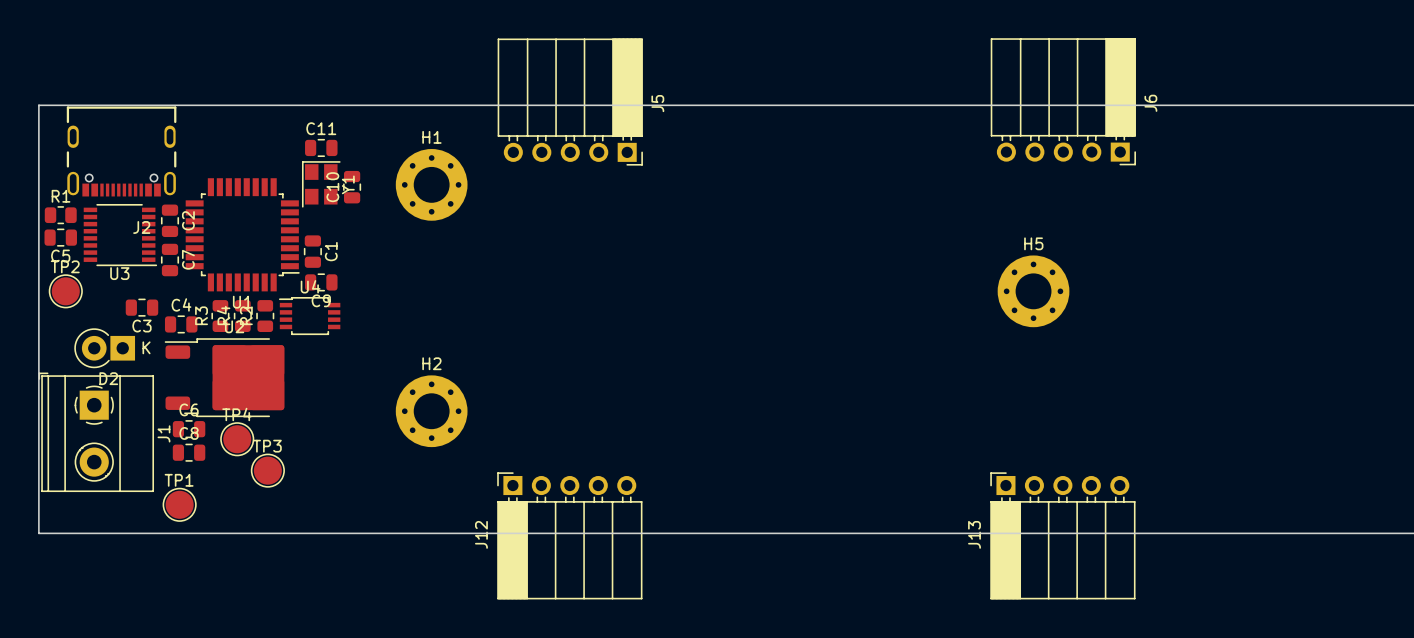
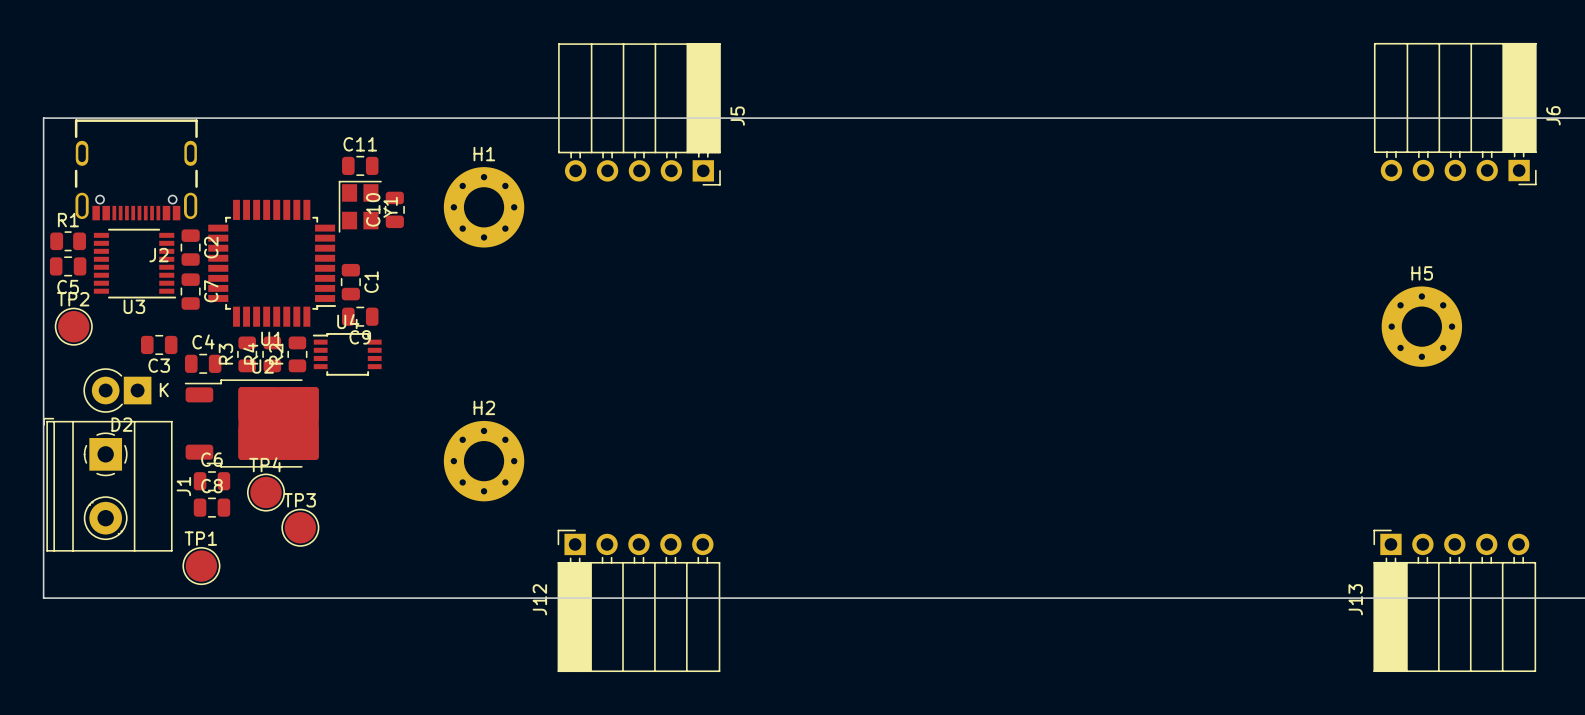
J6 position: (1063, 101) -> (1455, 114)
H5 position: (1033, 291) -> (1421, 326)
J13 position: (1062, 535) -> (1454, 600)

